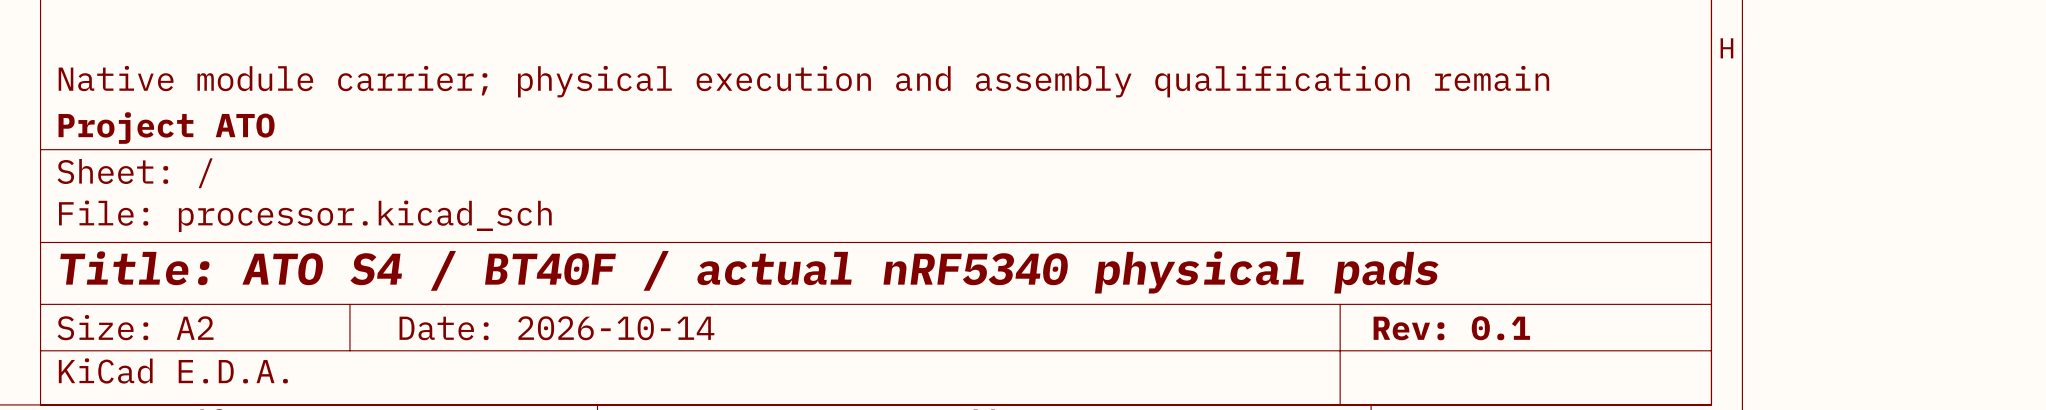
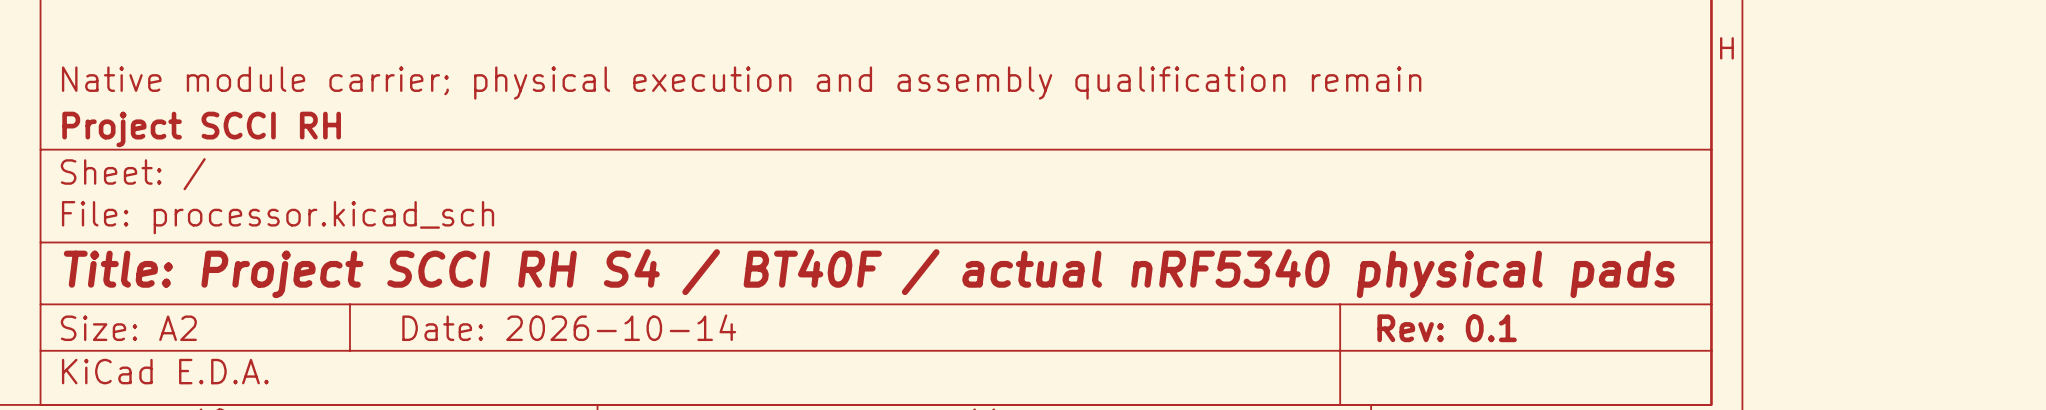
title block: Project ATO (166, 128) -> Project SCCI RH (201, 129)
title block: Title: ATO S4 / BT40F / actual nRF5340 physical pads (749, 272) -> Title: Project SCCI RH S4 / BT40F / actual nRF5340 physical pads (869, 273)

